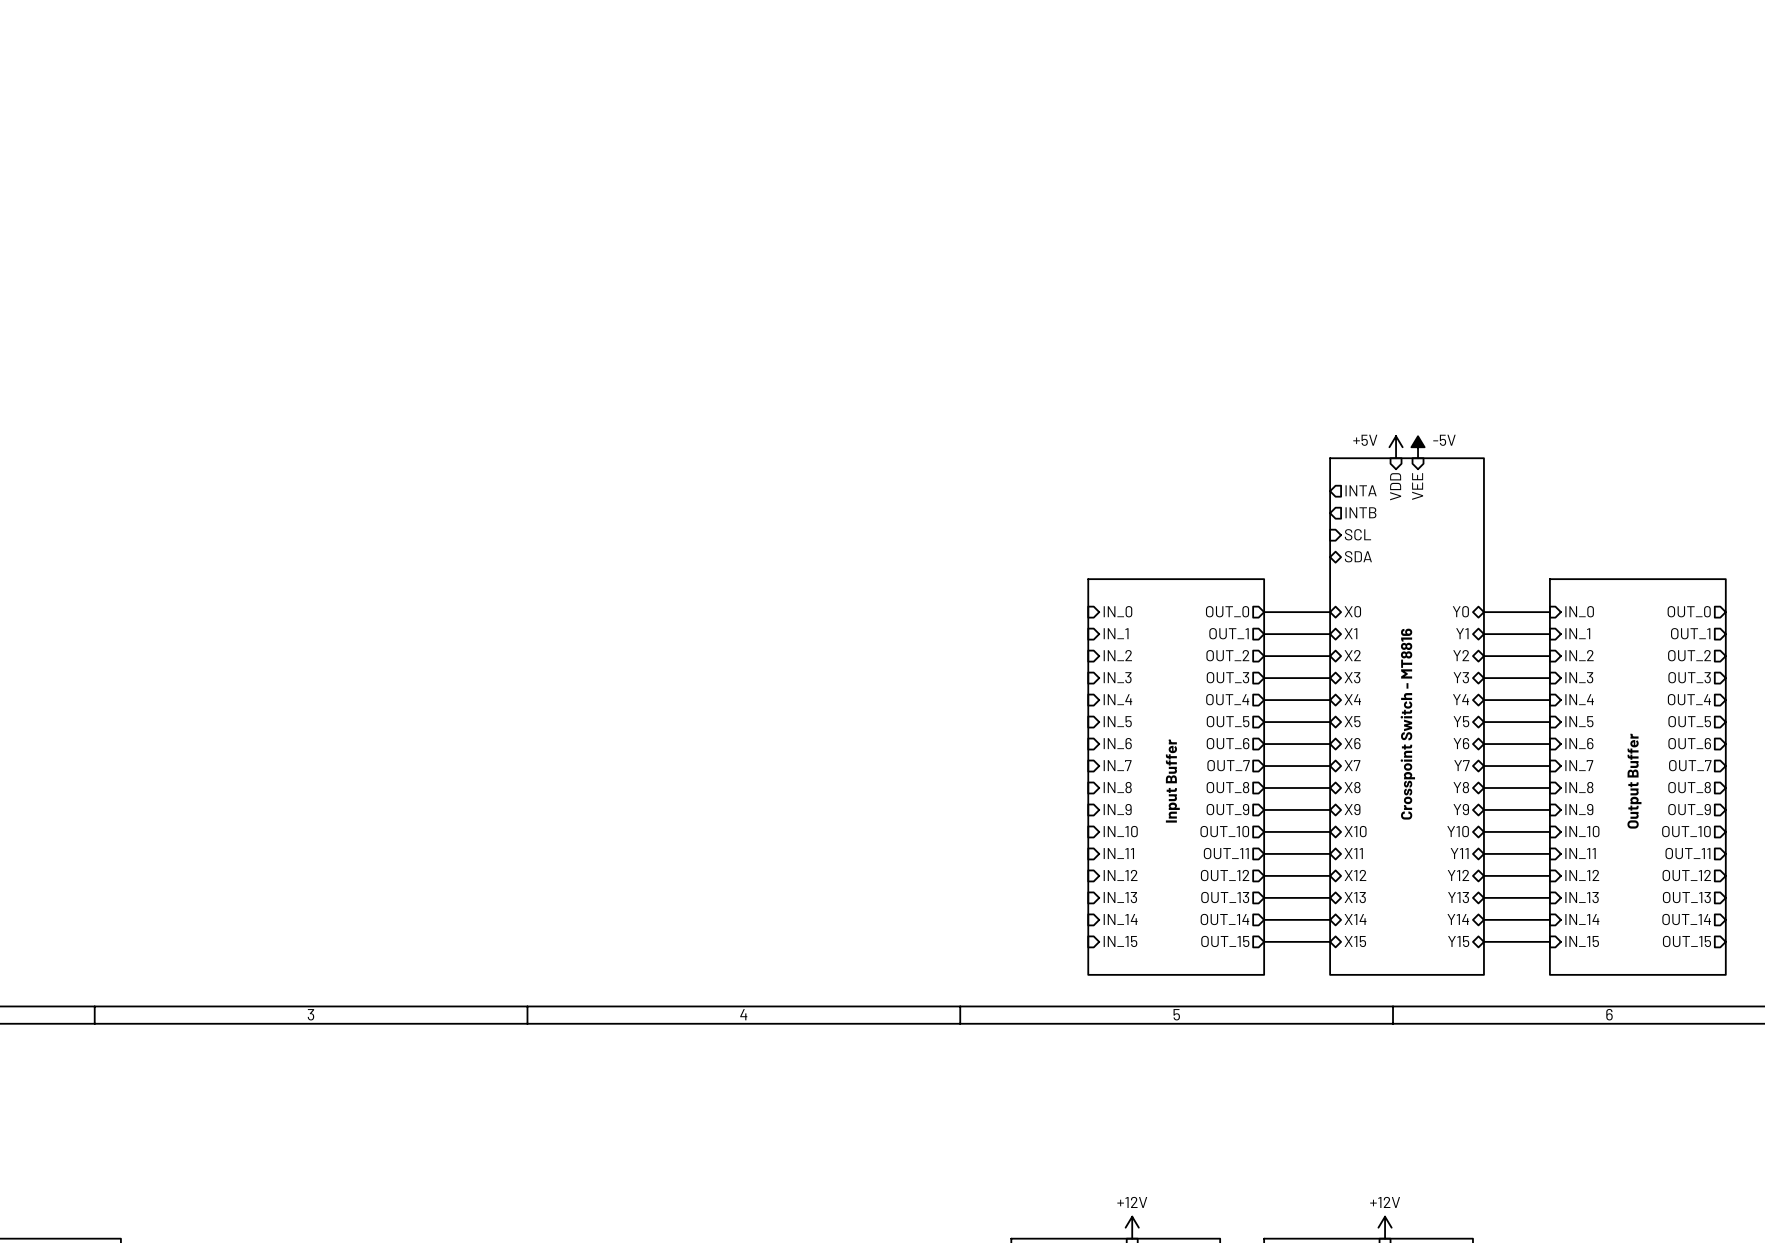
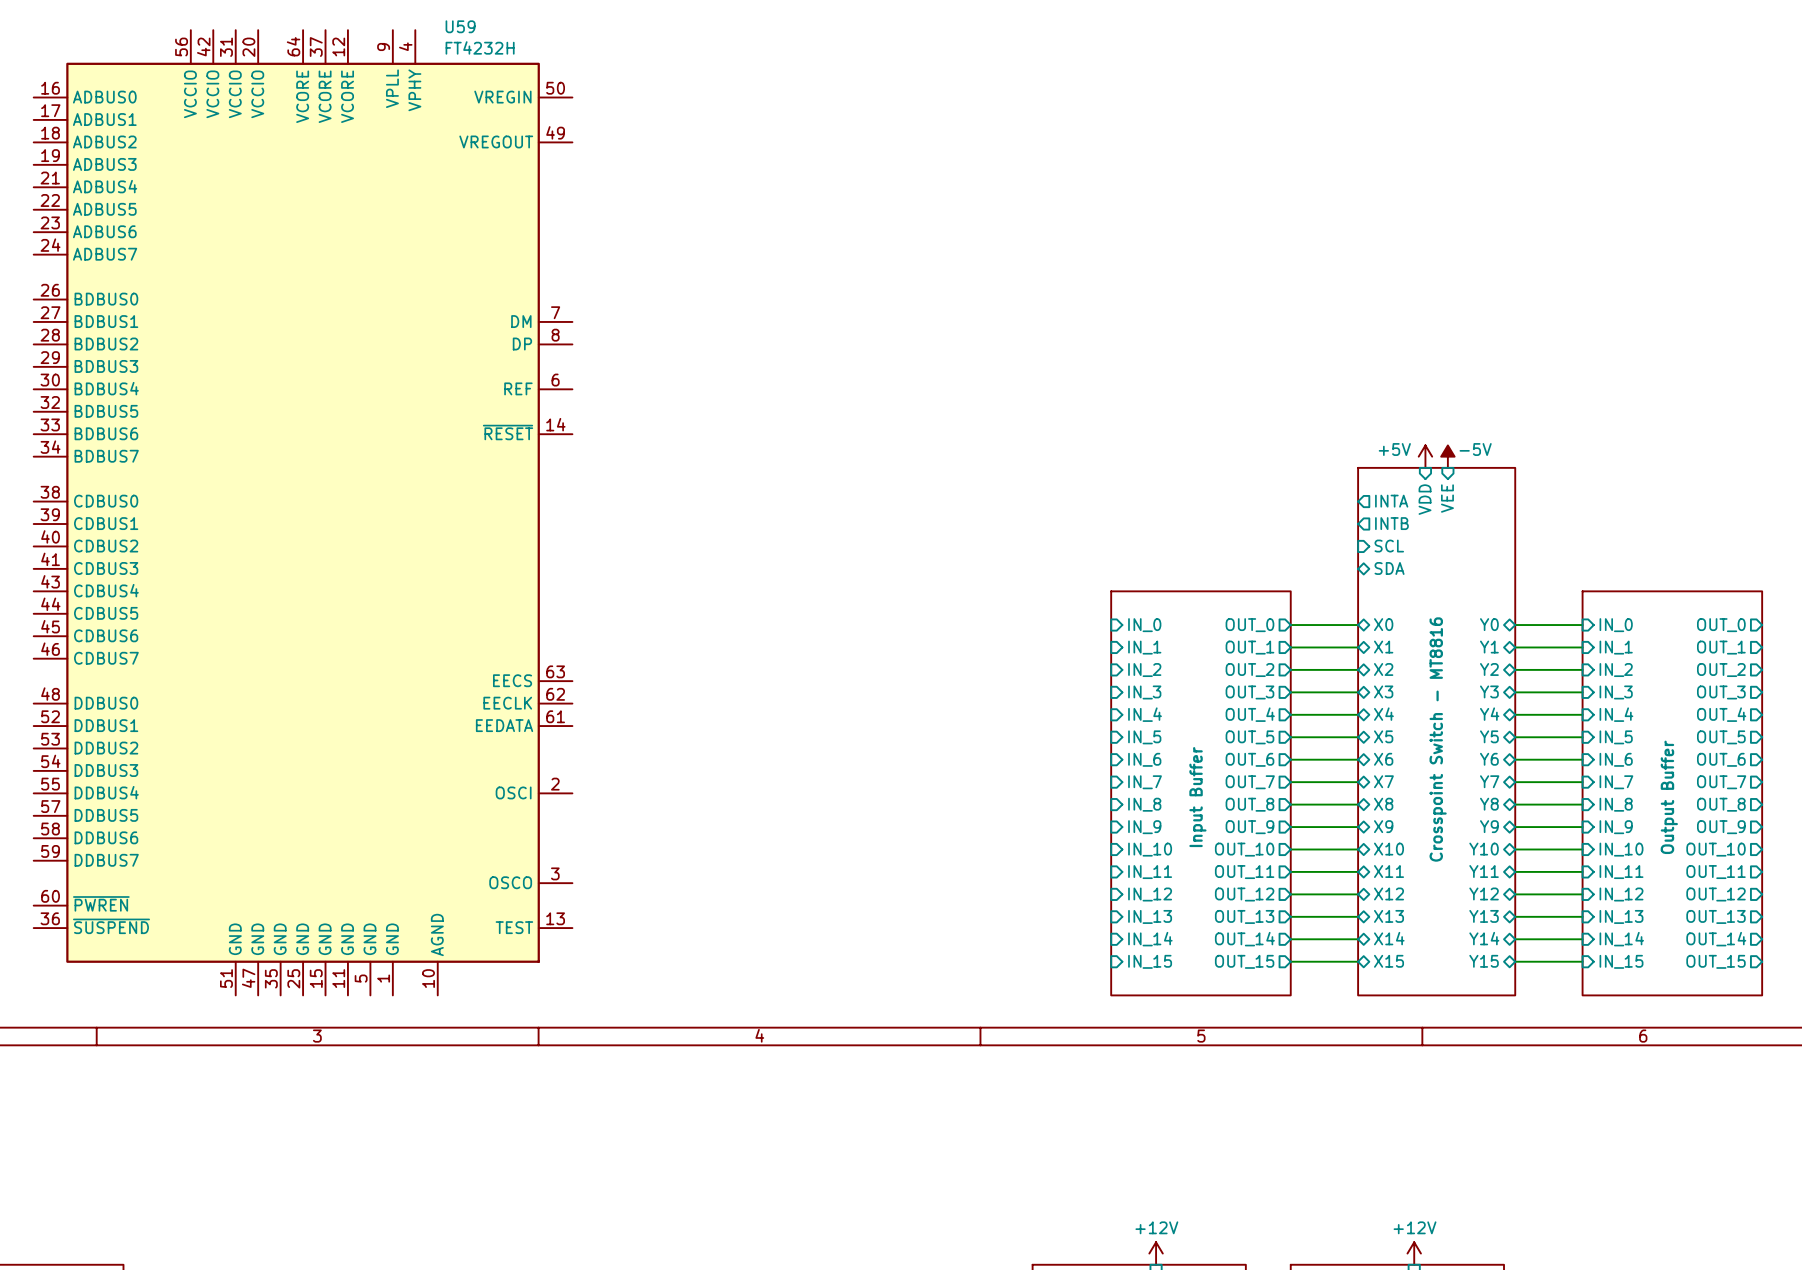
U59: none -> FT4232H (303, 512)

